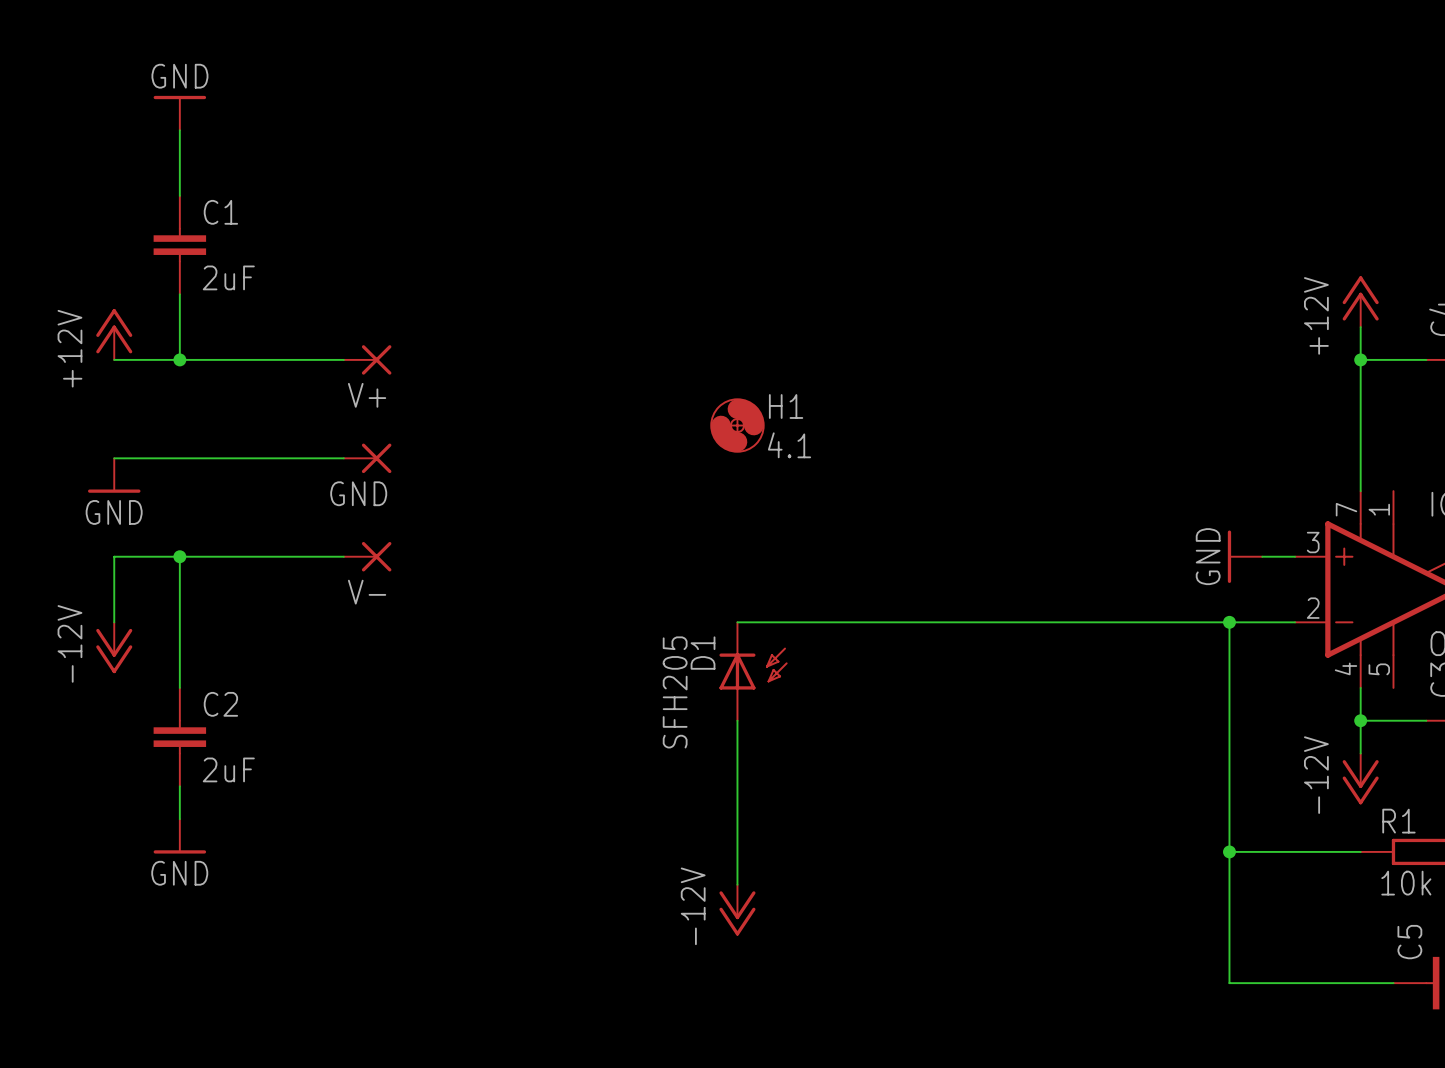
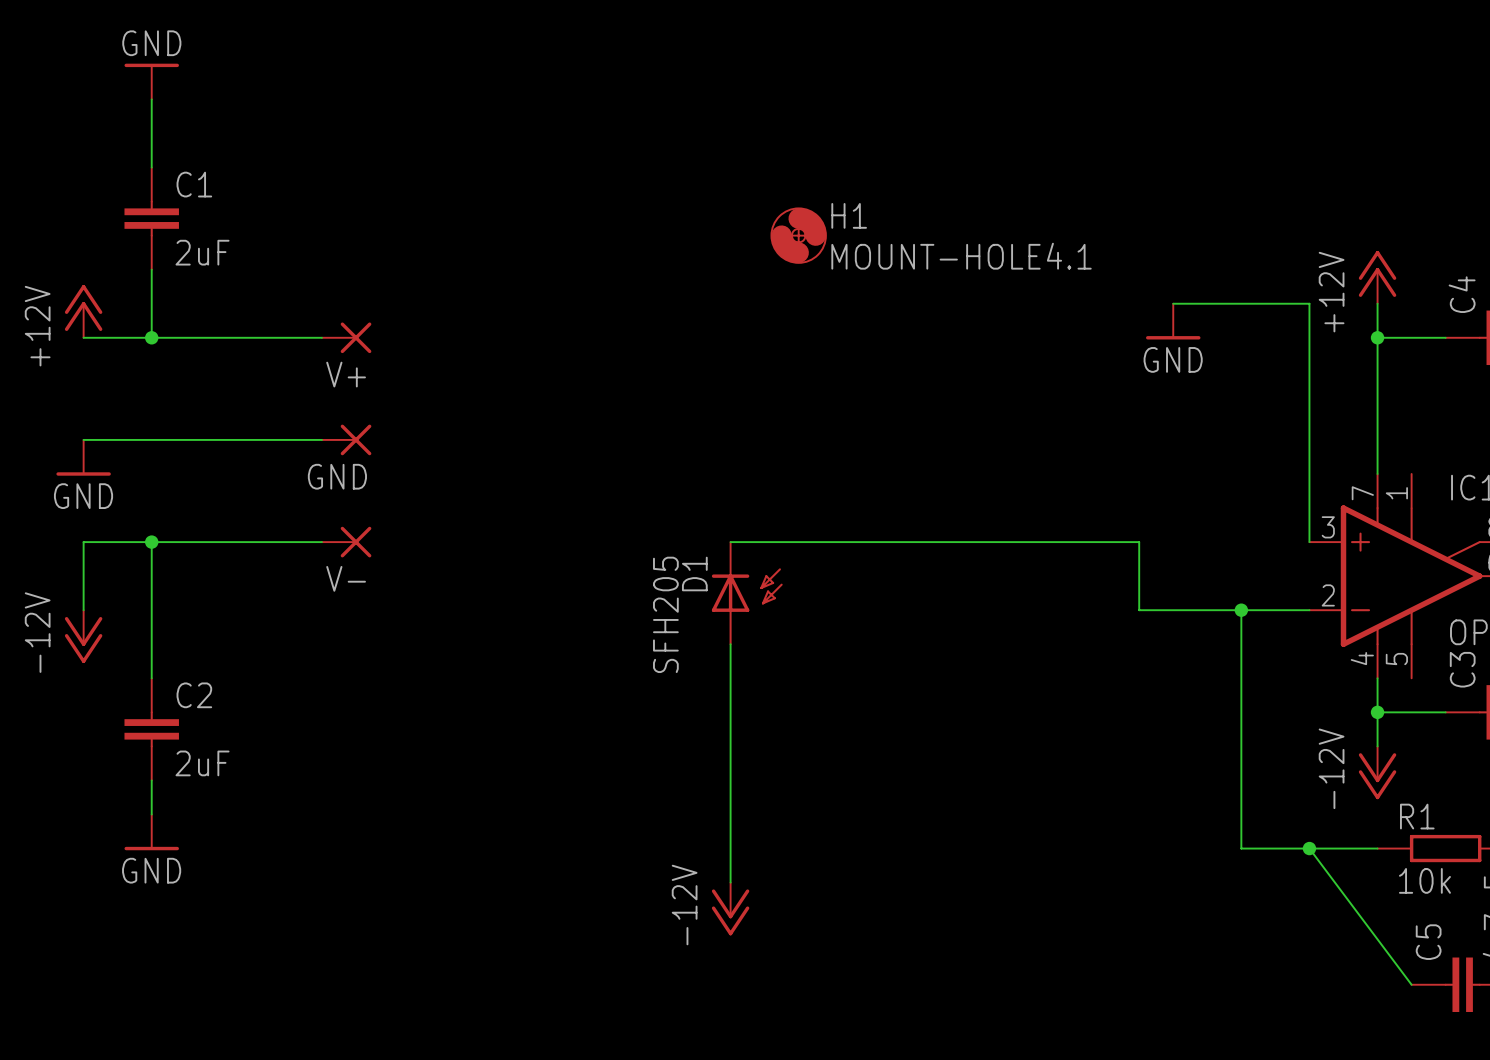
H1 position: (737, 425) -> (798, 235)
H1 value: 4.1 (789, 445) -> MOUNT-HOLE4.1 (961, 256)
power symbol rotation: 0° (1229, 556) -> 90° counterclockwise (1173, 337)
power symbol position: GND (1245, 556) -> GND (1173, 321)
wire: (1262, 556) (1295, 556) -> (1173, 303) (1309, 303) (1309, 542)
wire: (737, 622) (1131, 622) -> (730, 542) (1139, 542) (1139, 610)
D1 position: (753, 672) -> (747, 593)
wire: (1229, 851) (1229, 983) (1393, 983) -> (1309, 848) (1411, 984)
junction position: (1229, 851) -> (1309, 848)

